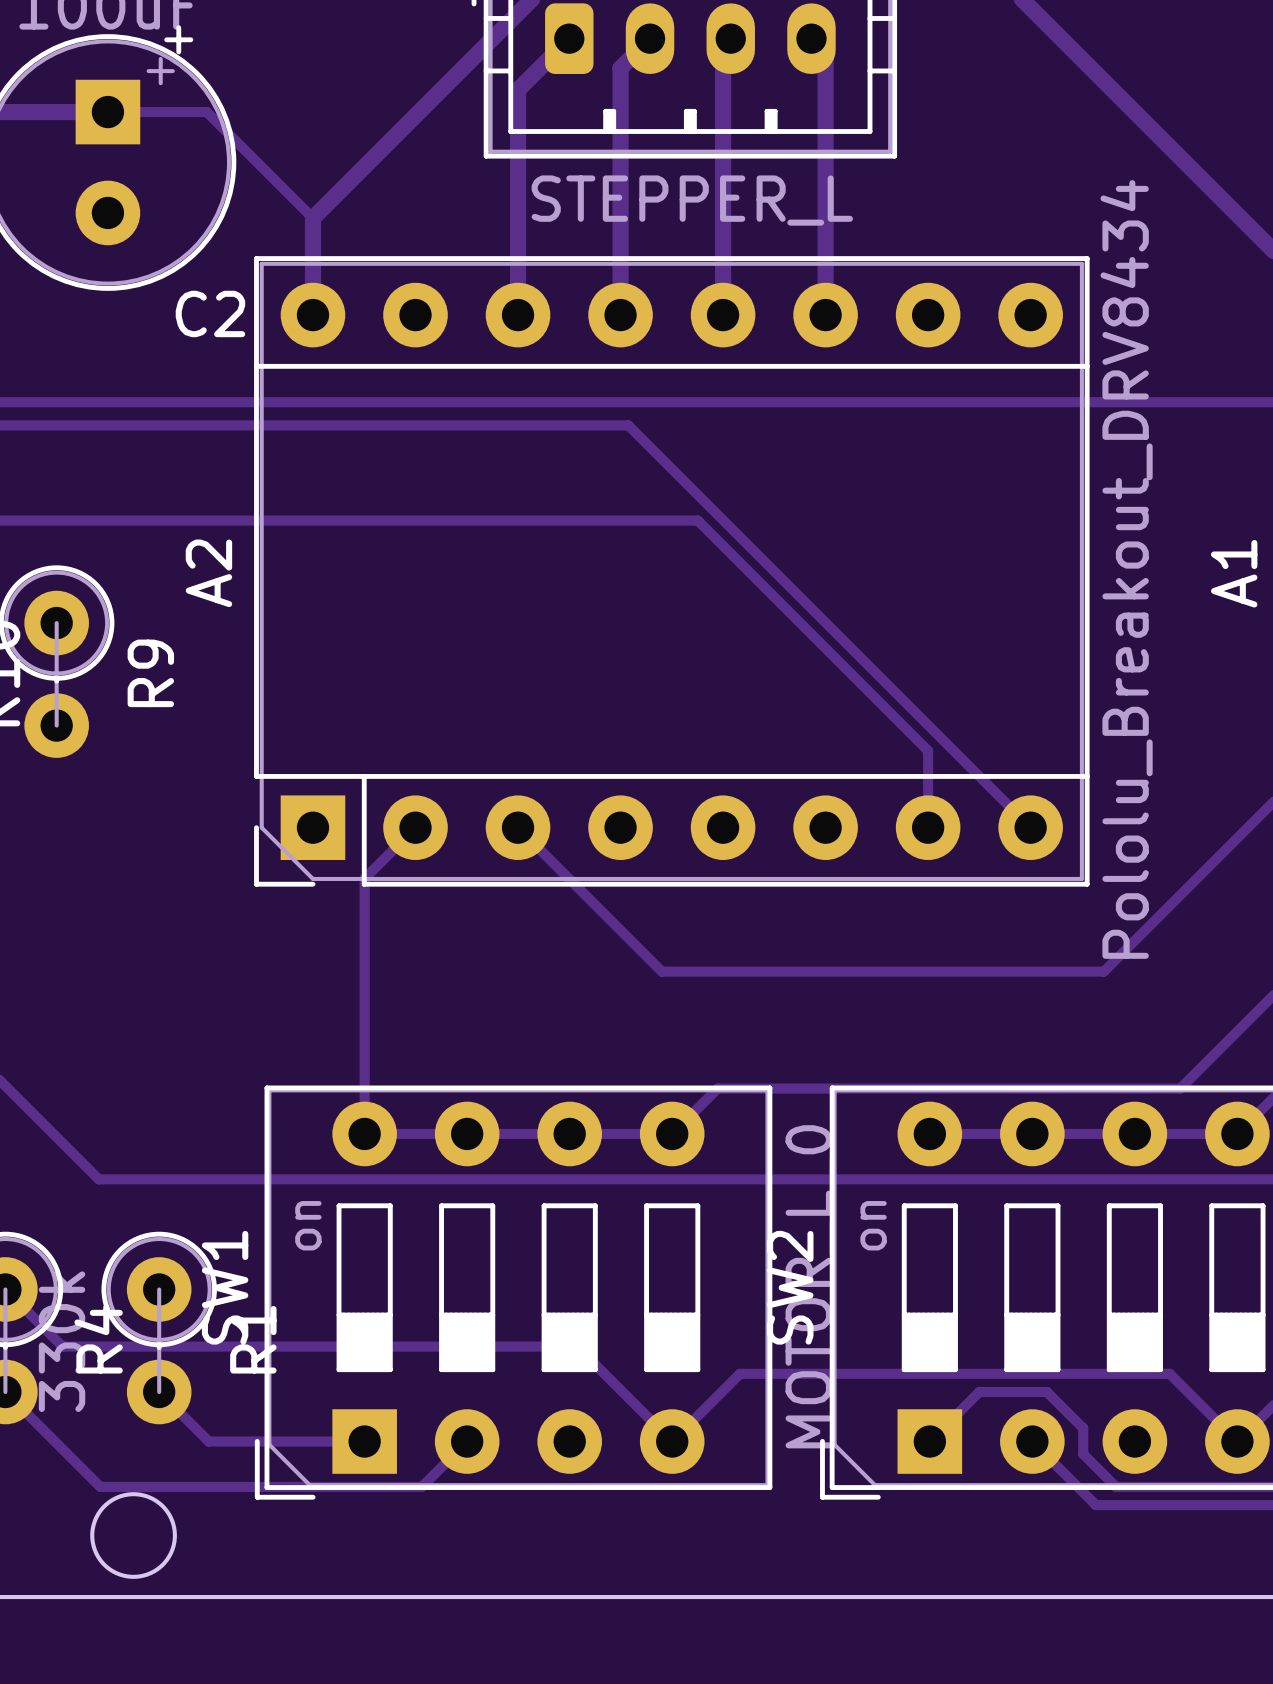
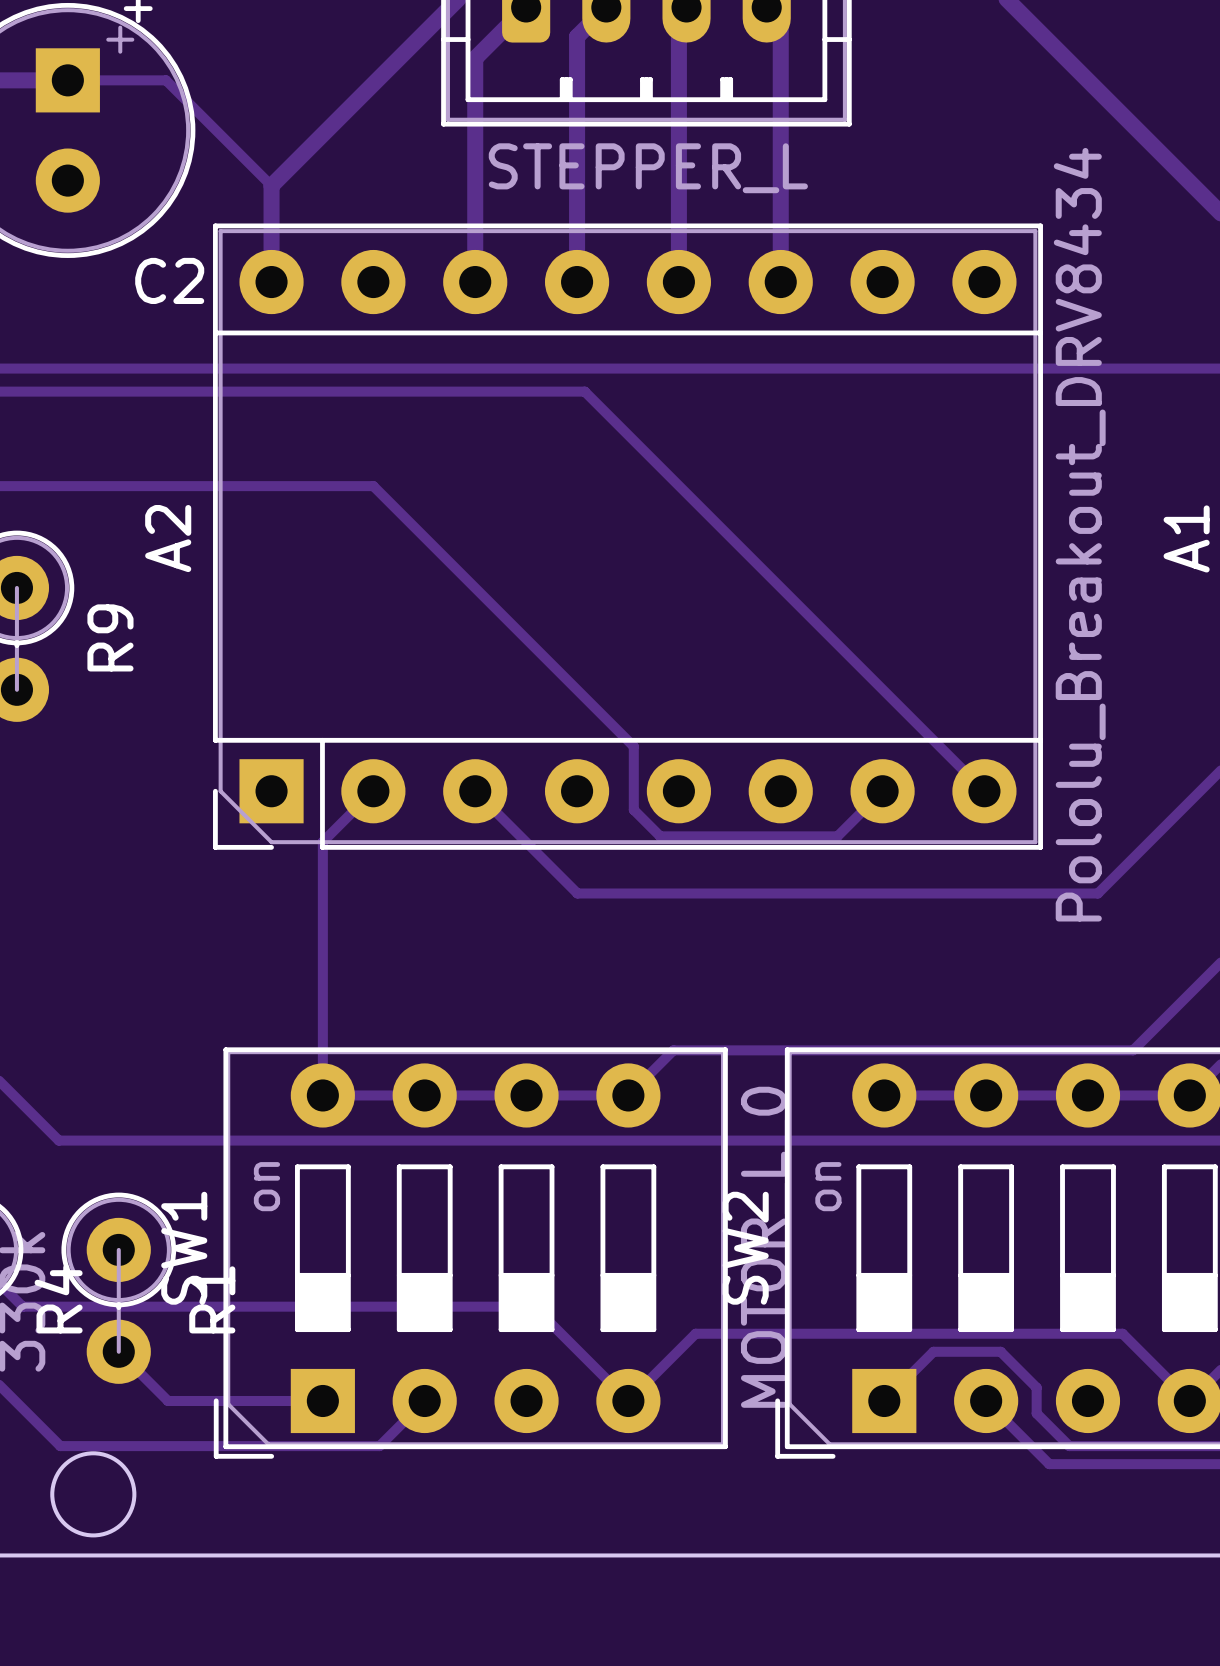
track: (415, 520) (697, 520) (928, 750) (928, 827) -> (373, 486) (633, 746) (633, 809) (660, 836) (837, 836) (882, 791)
track: (620, 930) (661, 971) (1103, 971) (1144, 930) -> (577, 893) (1097, 893)

